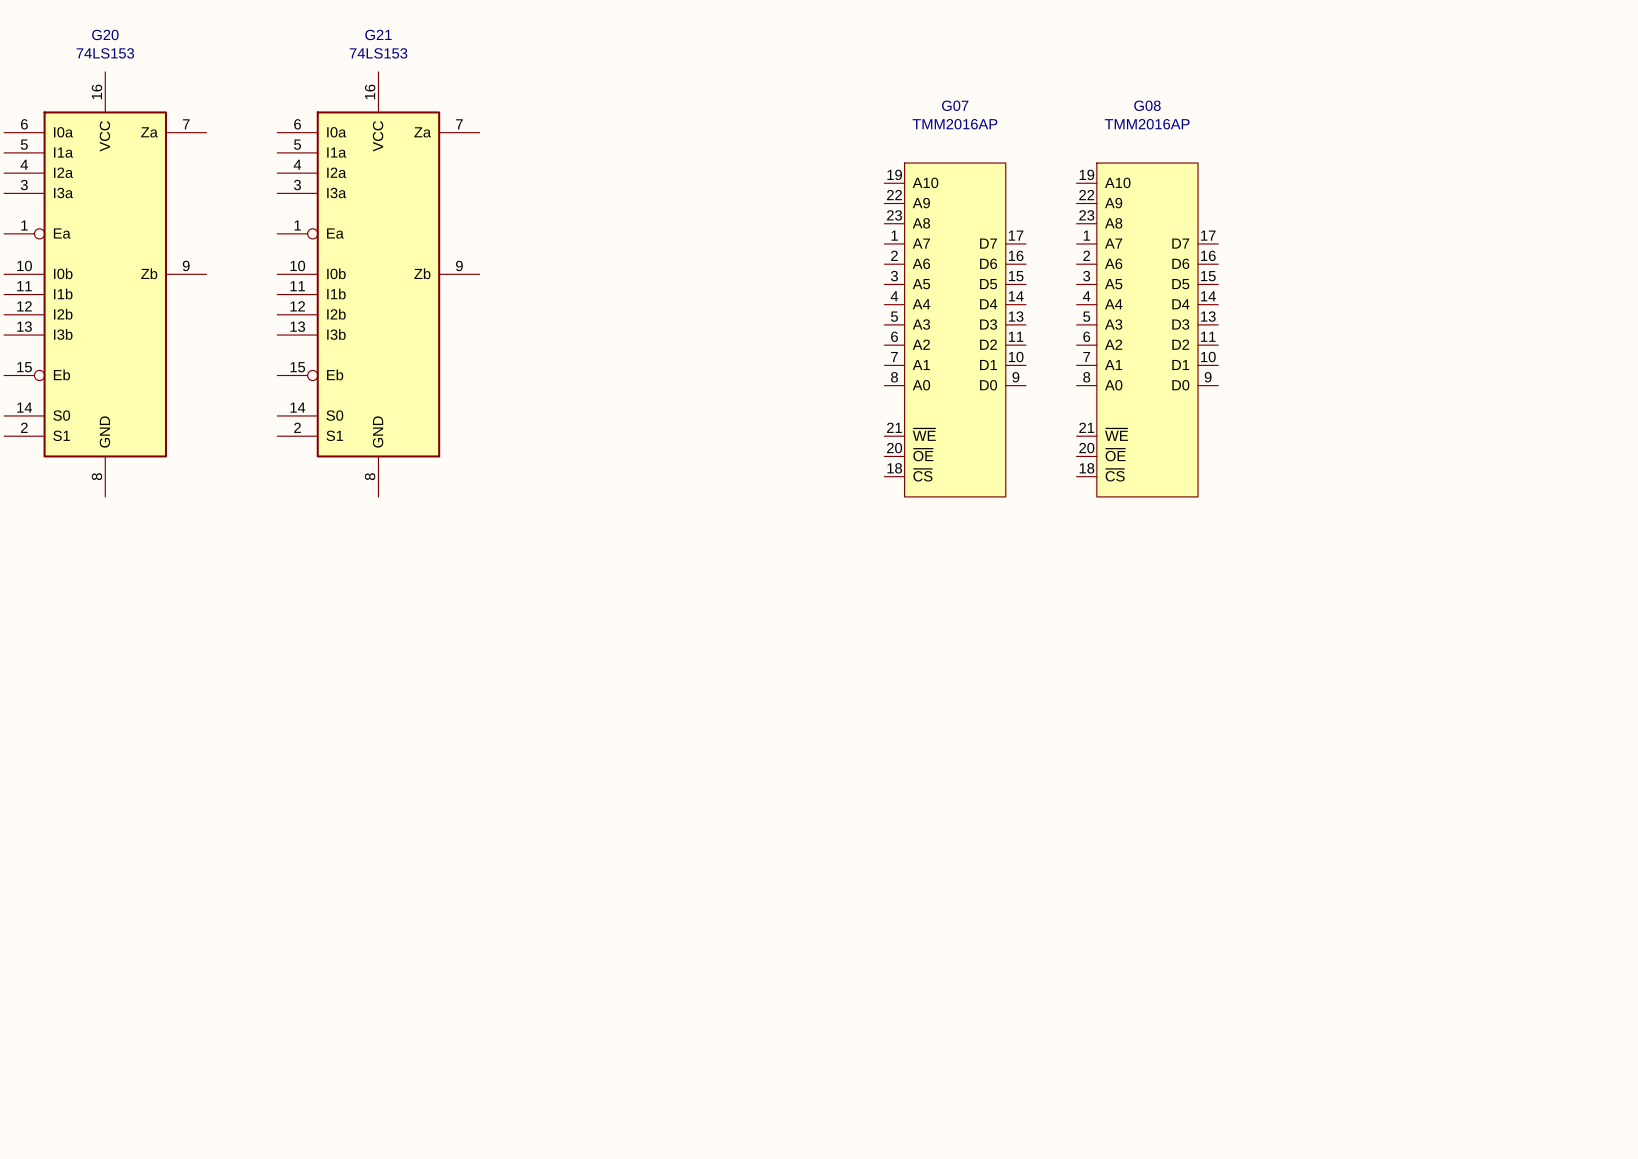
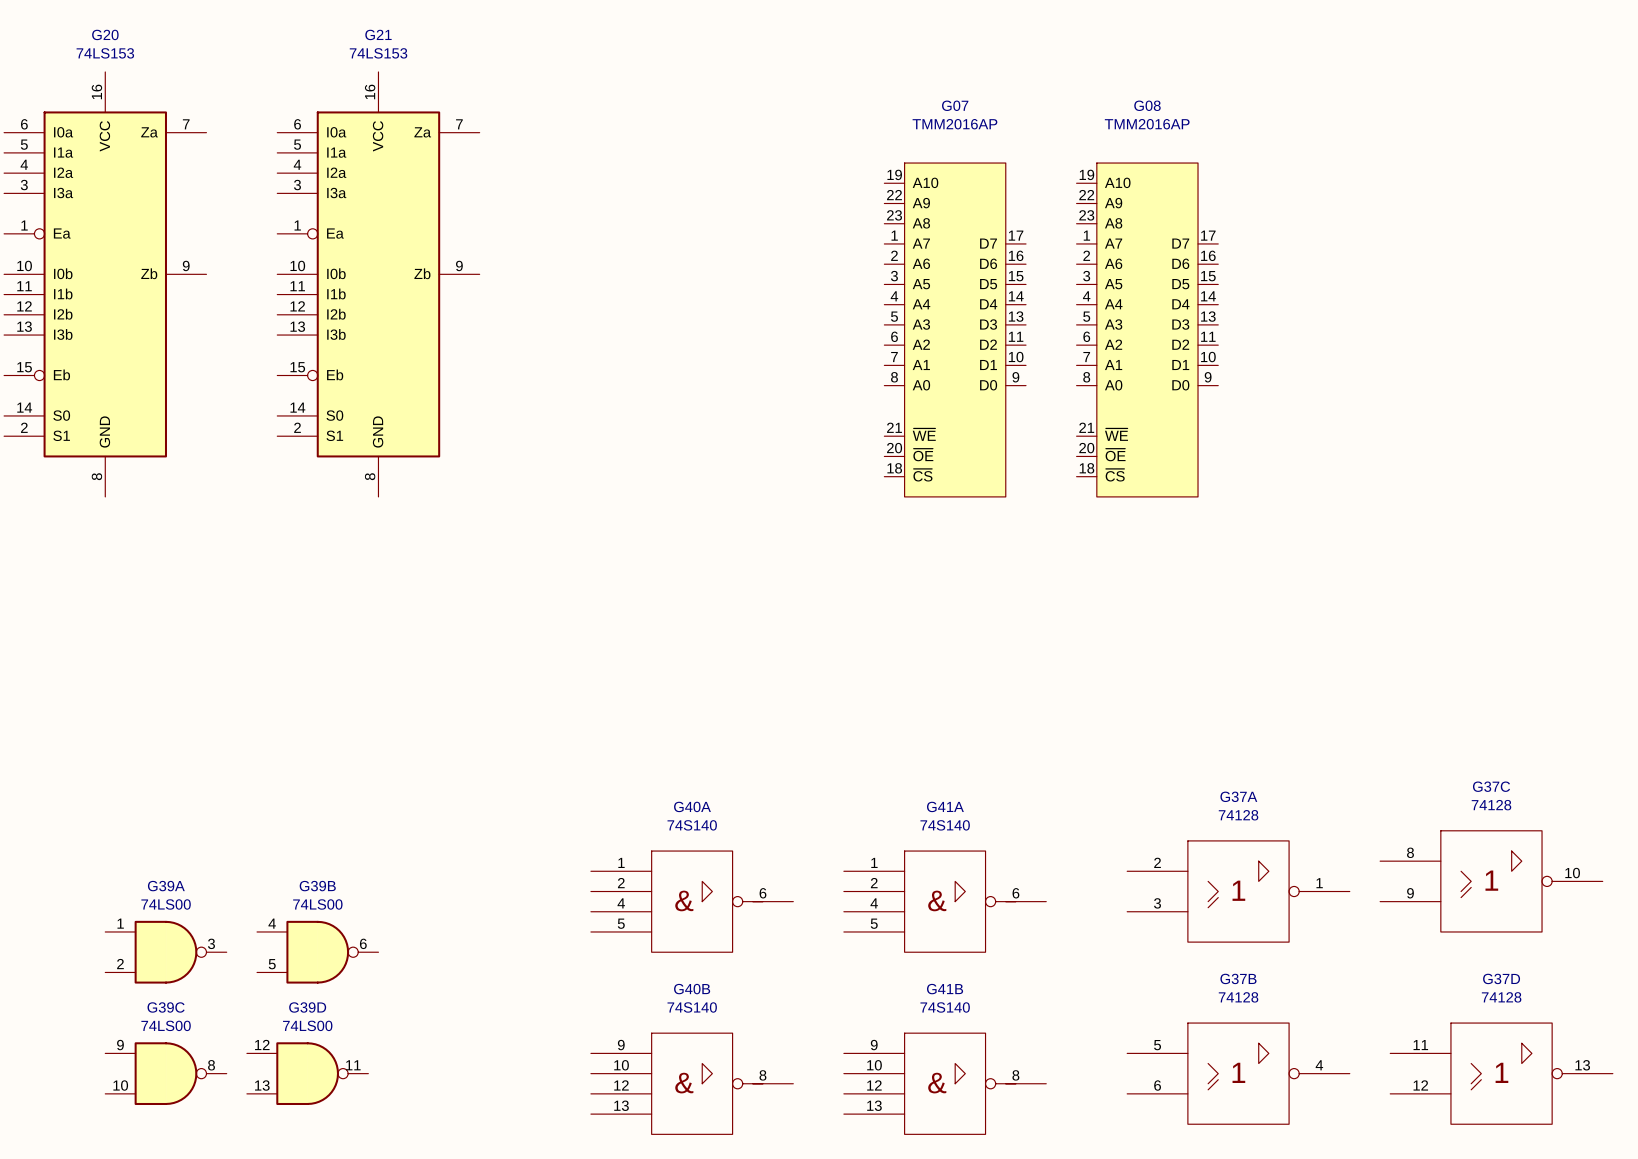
G37C: none -> 74128 (1491, 881)
G37A: none -> 74128 (1238, 891)
G40A: none -> 74S140 (692, 901)
G41A: none -> 74S140 (945, 901)
G39A: none -> 74LS00 (165, 952)
G39B: none -> 74LS00 (317, 952)
G39C: none -> 74LS00 (165, 1073)
G39D: none -> 74LS00 (307, 1073)
G37B: none -> 74128 (1238, 1073)
G37D: none -> 74128 (1501, 1073)
G40B: none -> 74S140 (692, 1083)
G41B: none -> 74S140 (945, 1083)

